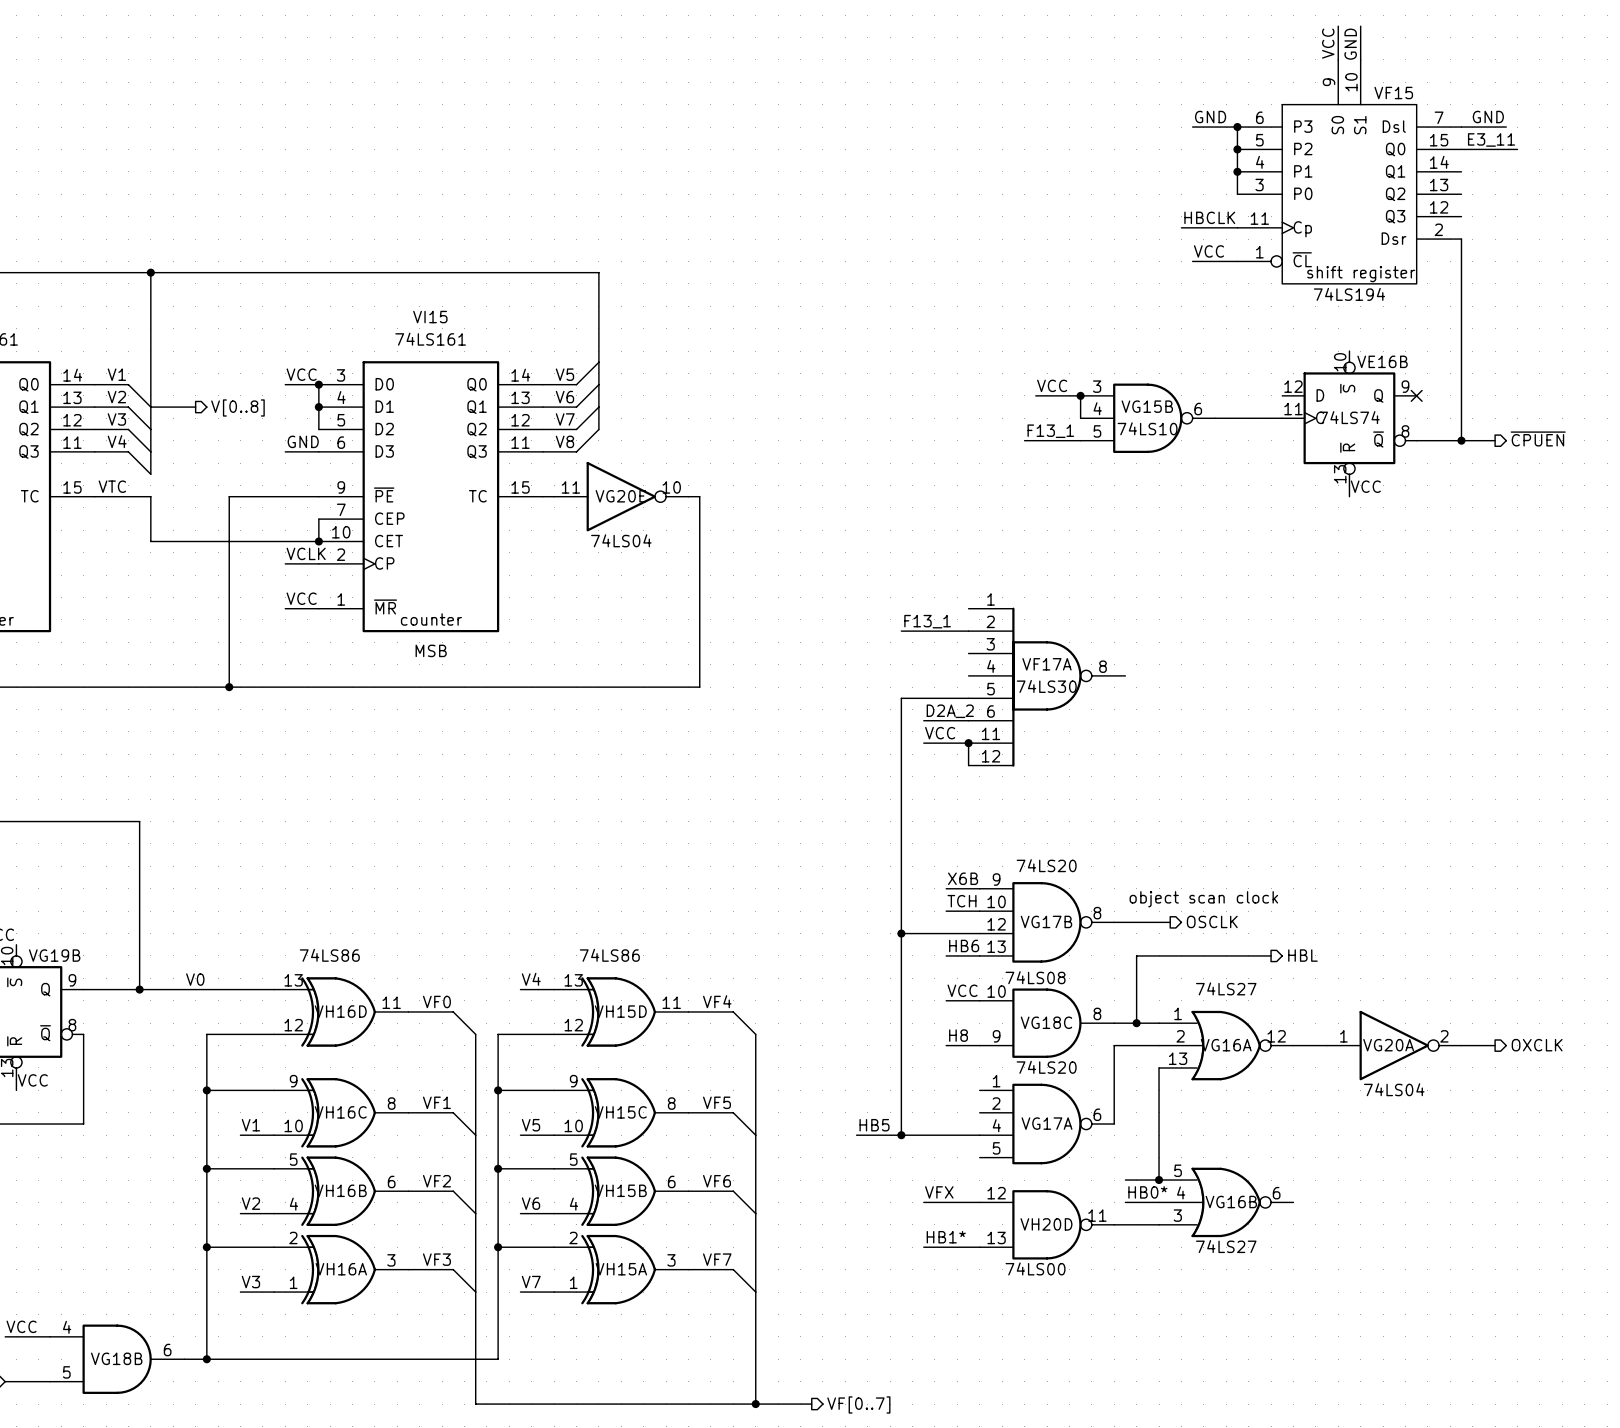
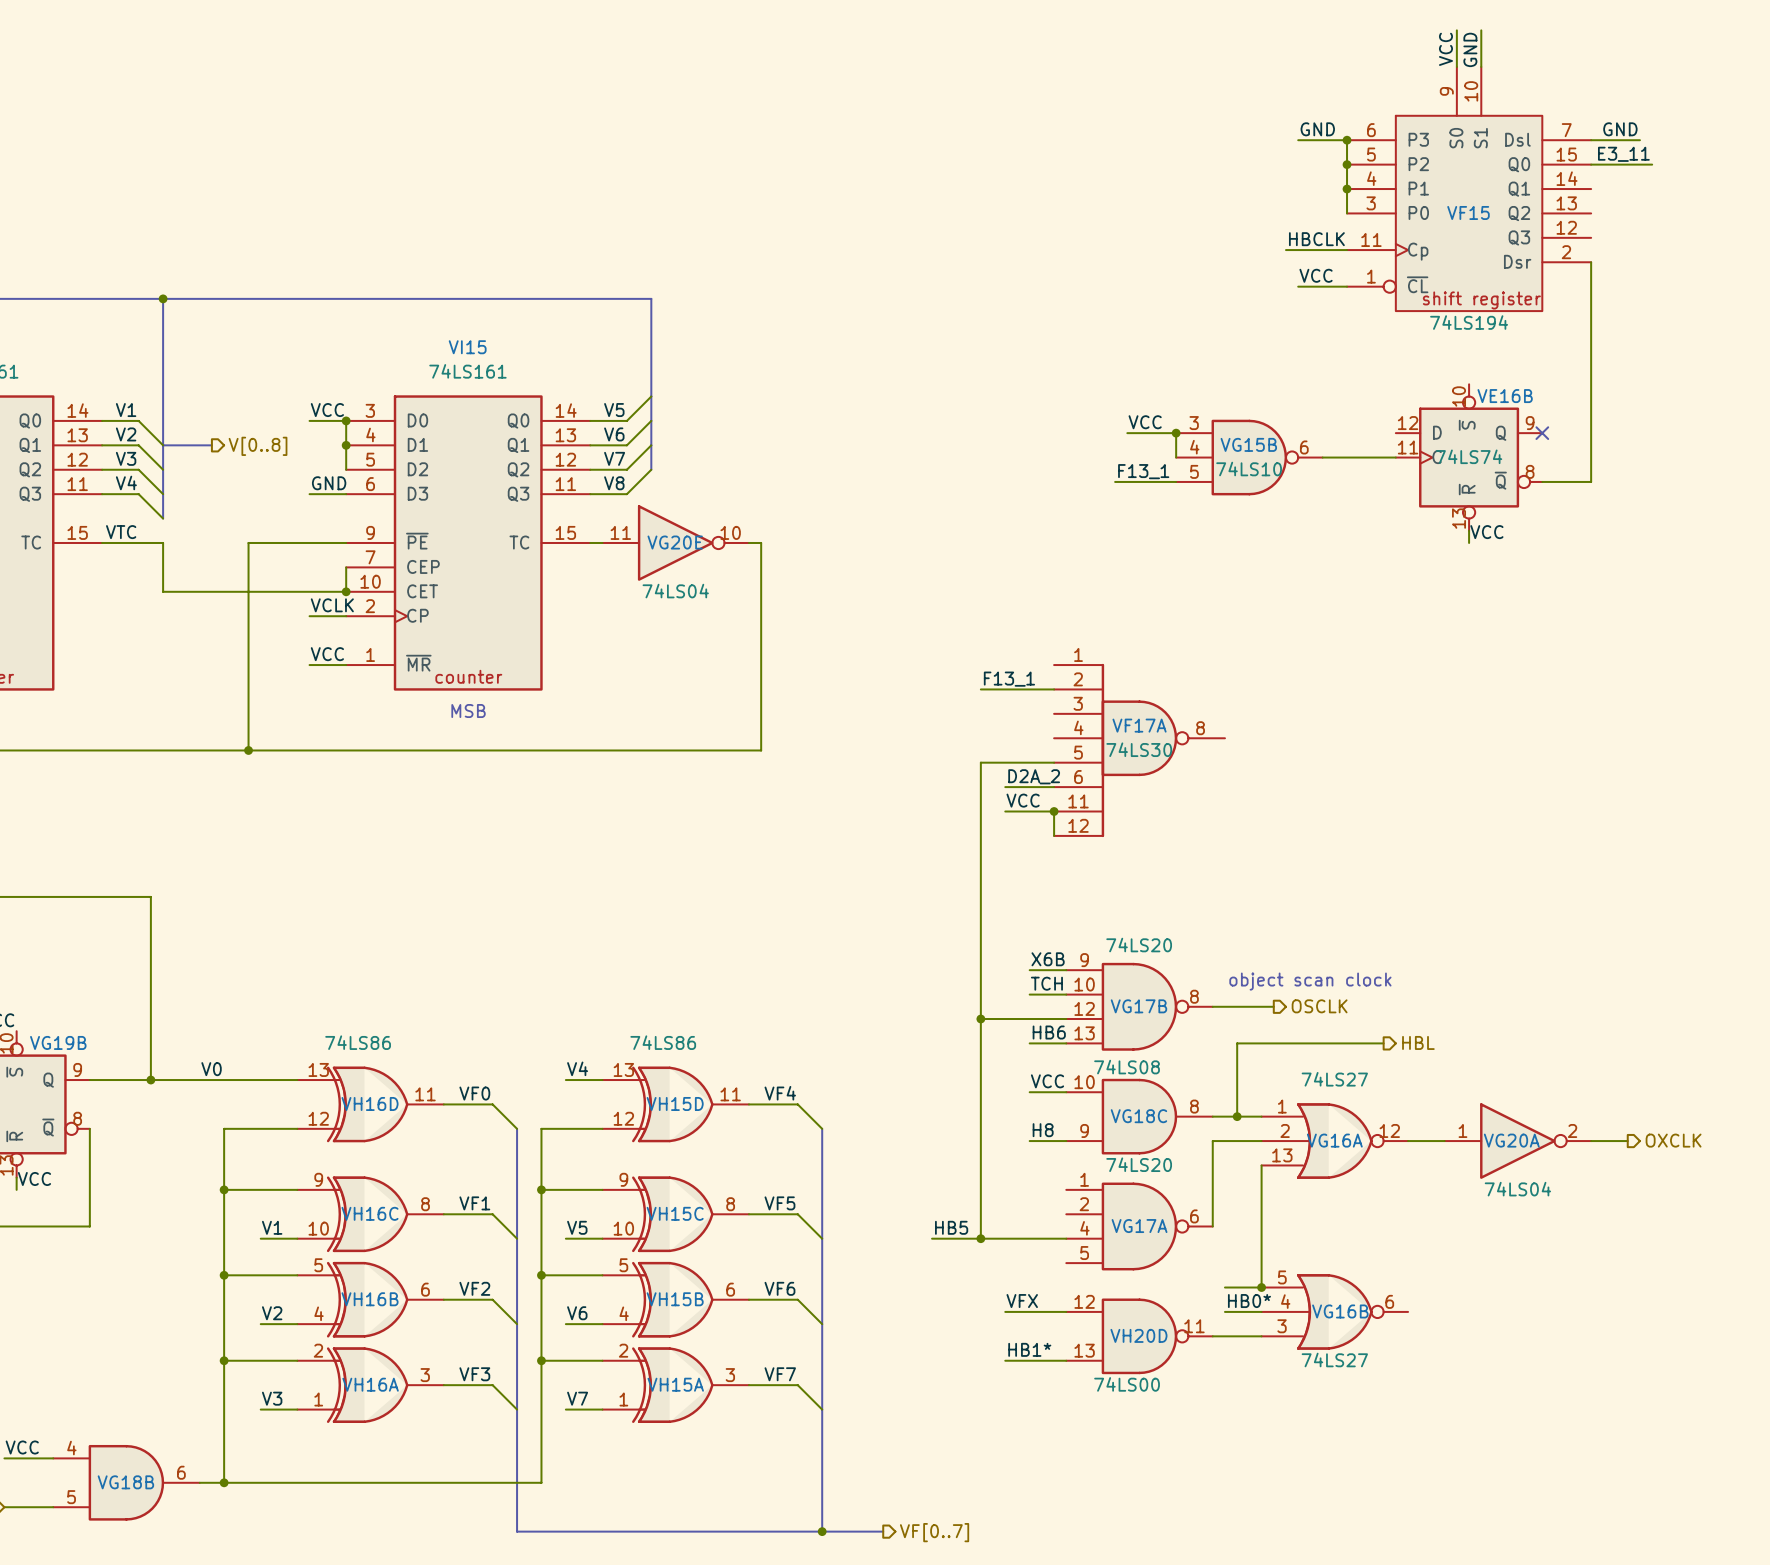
VF15 name position: VF15 (1393, 93) -> VF15 (1468, 212)
hierarchical label: ~{CPUEN} (1538, 438) -> none
wire: (1461, 440) (1495, 440) -> none
junction: (1461, 440) -> none

